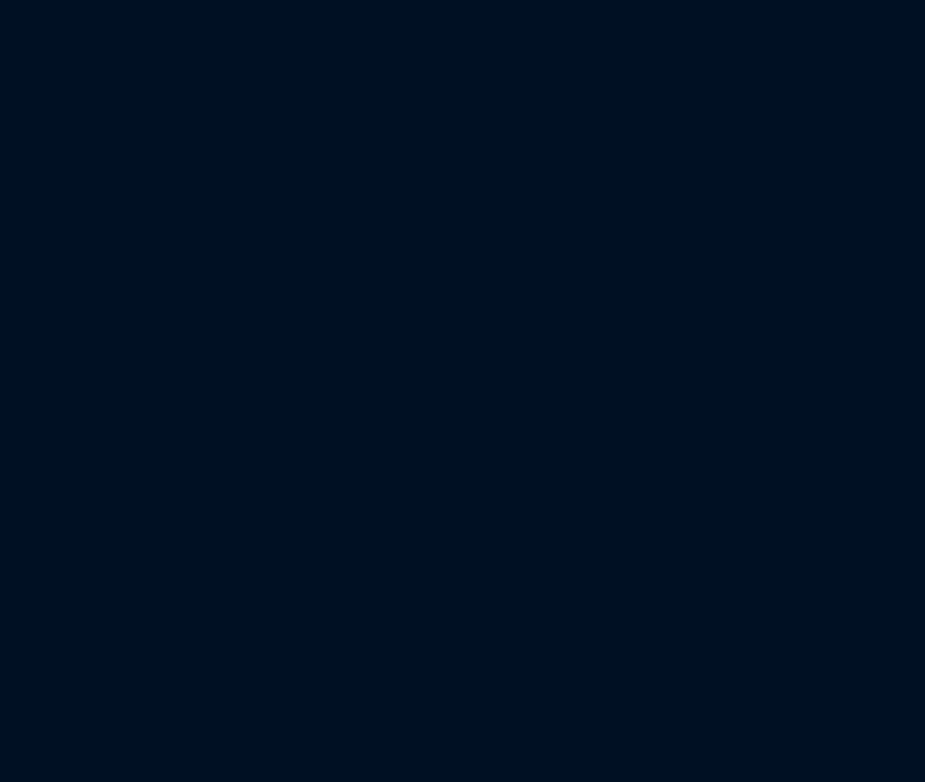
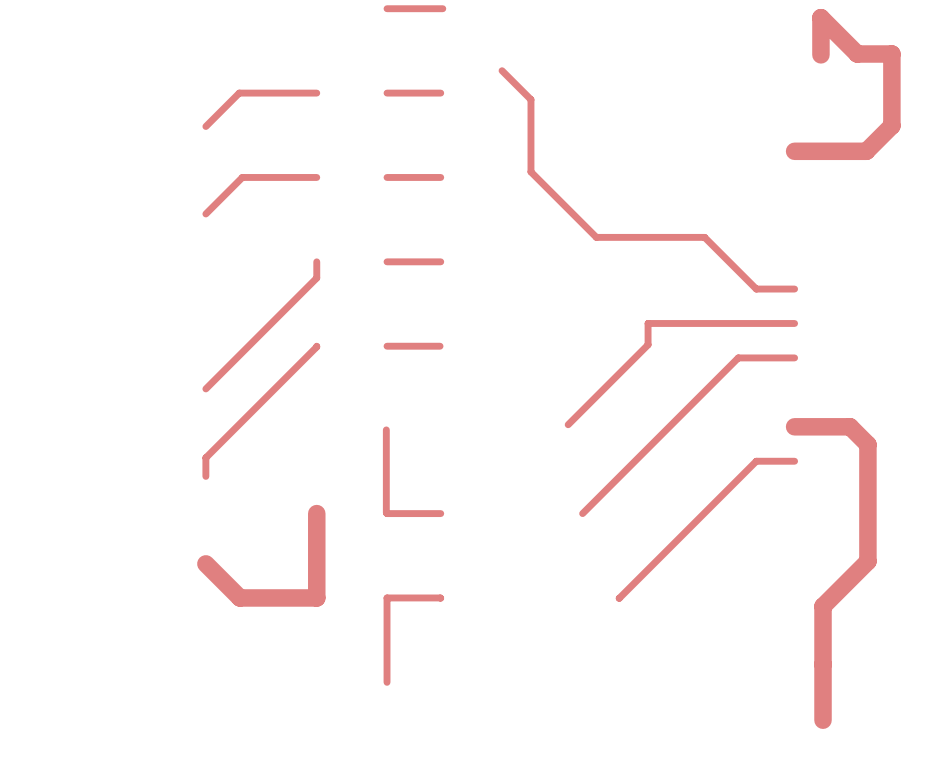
track: none -> (387, 8) (442, 8)
track: none -> (820, 54) (820, 17) (857, 54) (891, 54) (891, 125) (866, 151) (794, 151)
track: none -> (502, 70) (530, 99) (530, 171) (596, 237) (704, 237) (756, 289) (794, 289)
track: none -> (316, 93) (239, 93) (205, 126)
track: none -> (387, 93) (440, 93)
track: none -> (316, 177) (242, 177) (205, 213)
track: none -> (387, 177) (440, 177)
track: none -> (316, 261) (316, 278) (205, 388)
track: none -> (387, 261) (440, 261)
track: none -> (794, 323) (648, 323) (648, 344) (568, 424)
track: none -> (316, 346) (205, 457) (205, 476)
track: none -> (387, 346) (440, 346)
track: none -> (794, 357) (738, 357) (582, 513)
track: none -> (794, 426) (850, 426) (867, 444) (867, 561) (823, 606) (823, 720)
track: none -> (386, 429) (386, 512)
track: none -> (794, 461) (756, 461) (619, 598)
track: none -> (316, 513) (316, 597) (239, 597) (205, 563)
track: none -> (387, 513) (440, 513)
track: none -> (440, 597) (387, 597) (387, 682)

